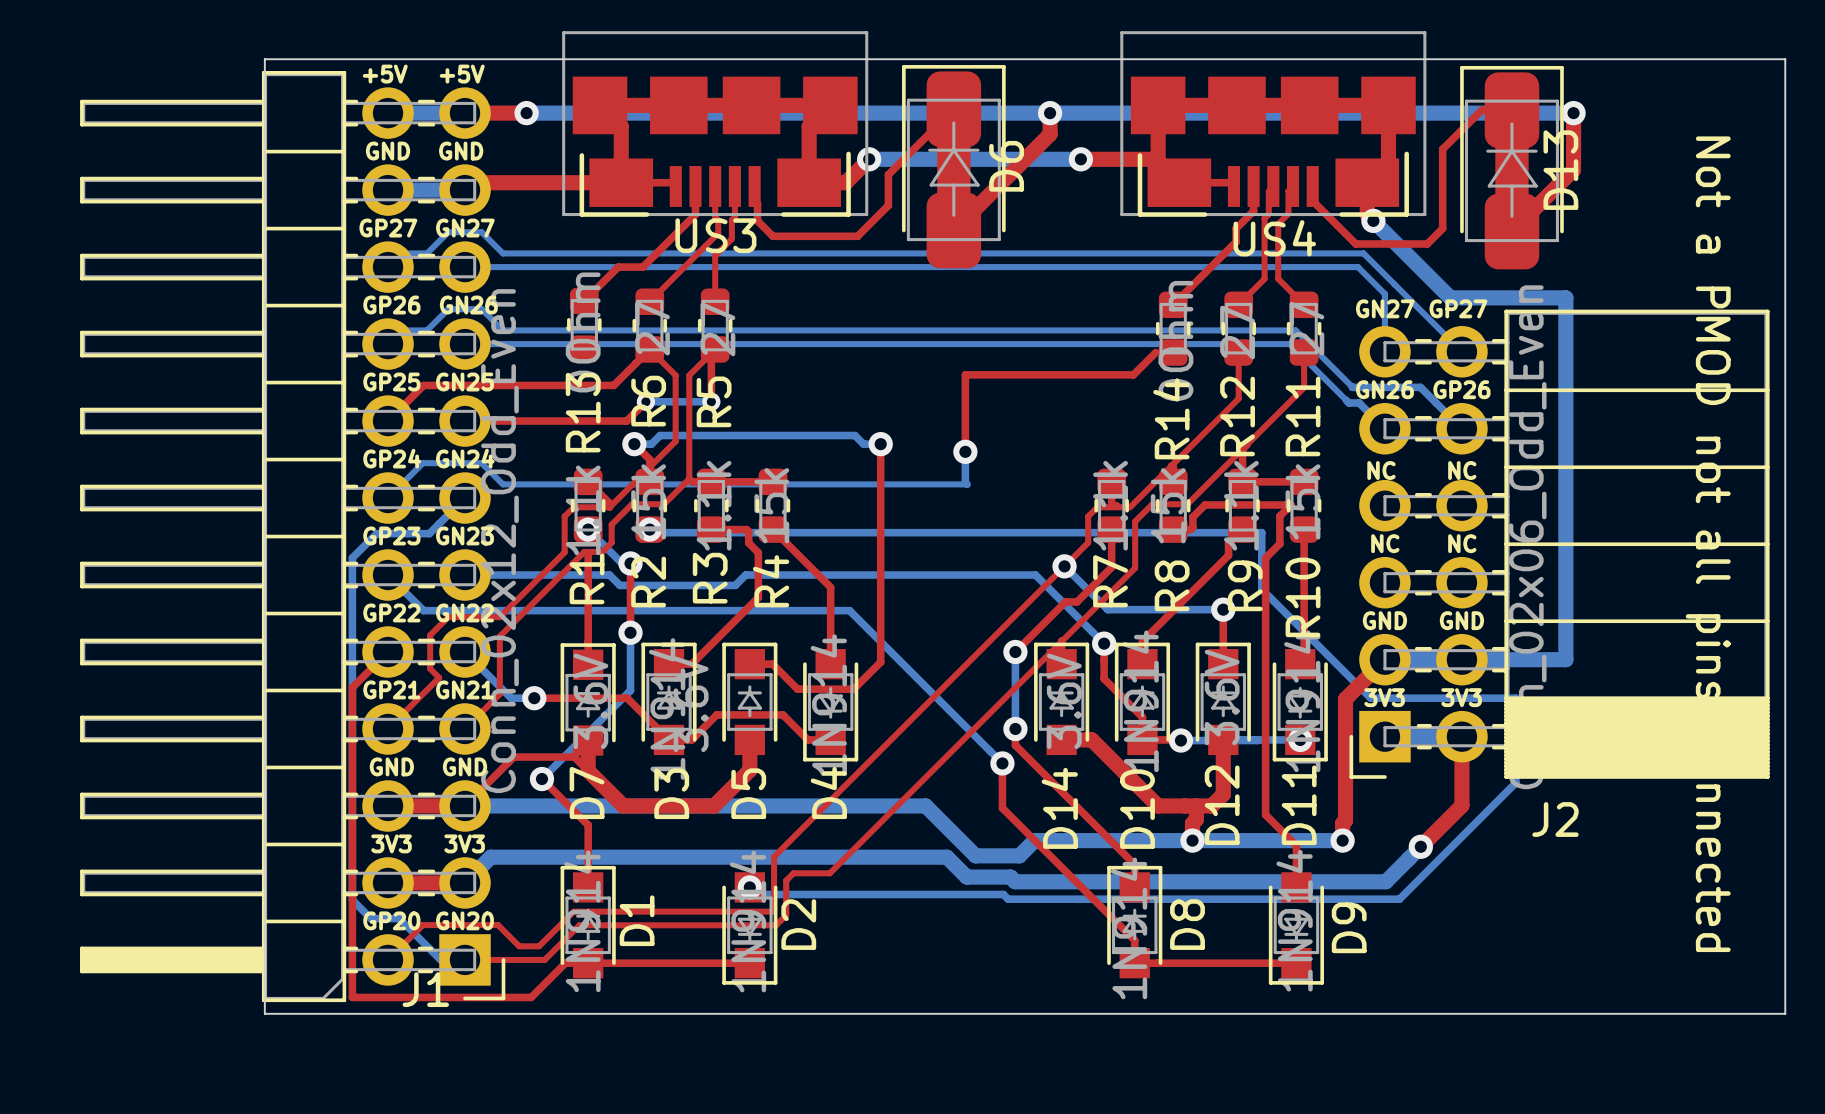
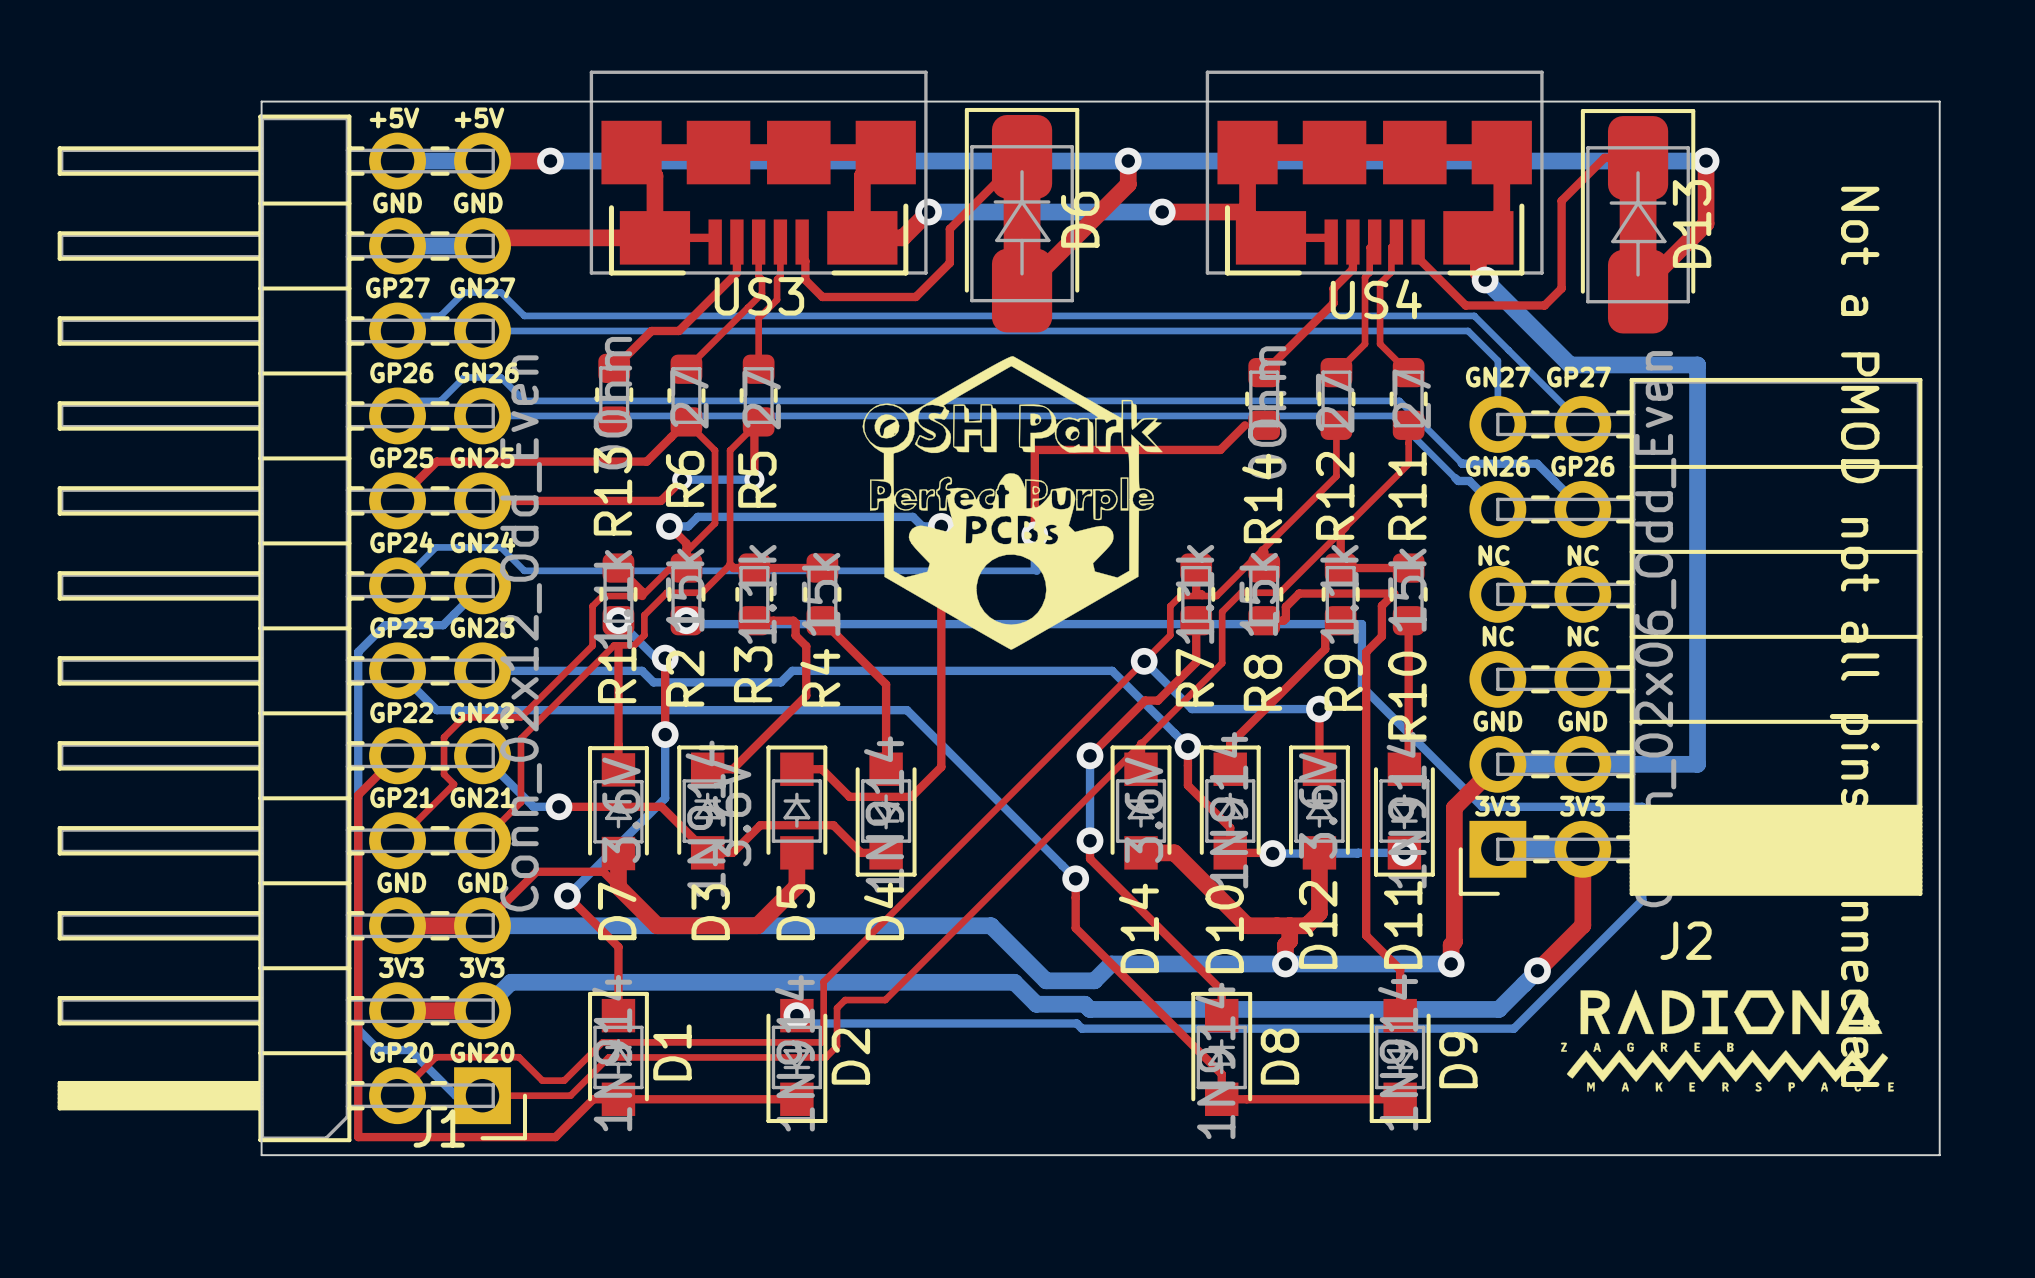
drawing: none -> [862, 356, 1163, 650]
drawing: none -> [1560, 989, 1894, 1092]

